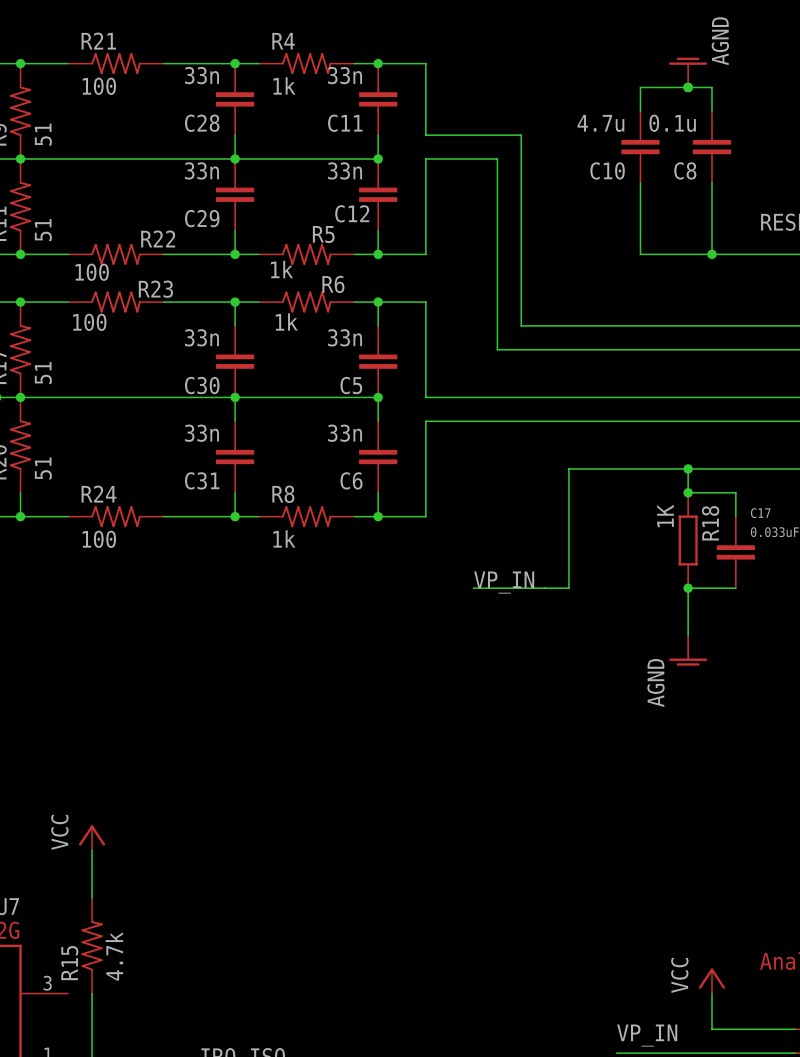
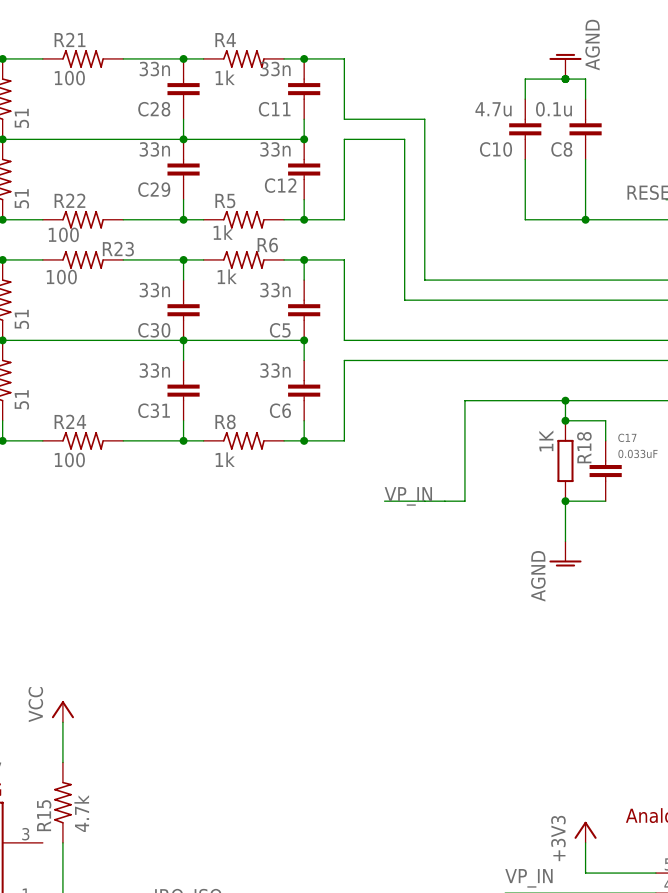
R5 name position: R5 (323, 234) -> R5 (225, 201)
R22 name position: R22 (158, 238) -> R22 (69, 200)
power symbol: VCC (711, 981) -> +3V3 (585, 832)

